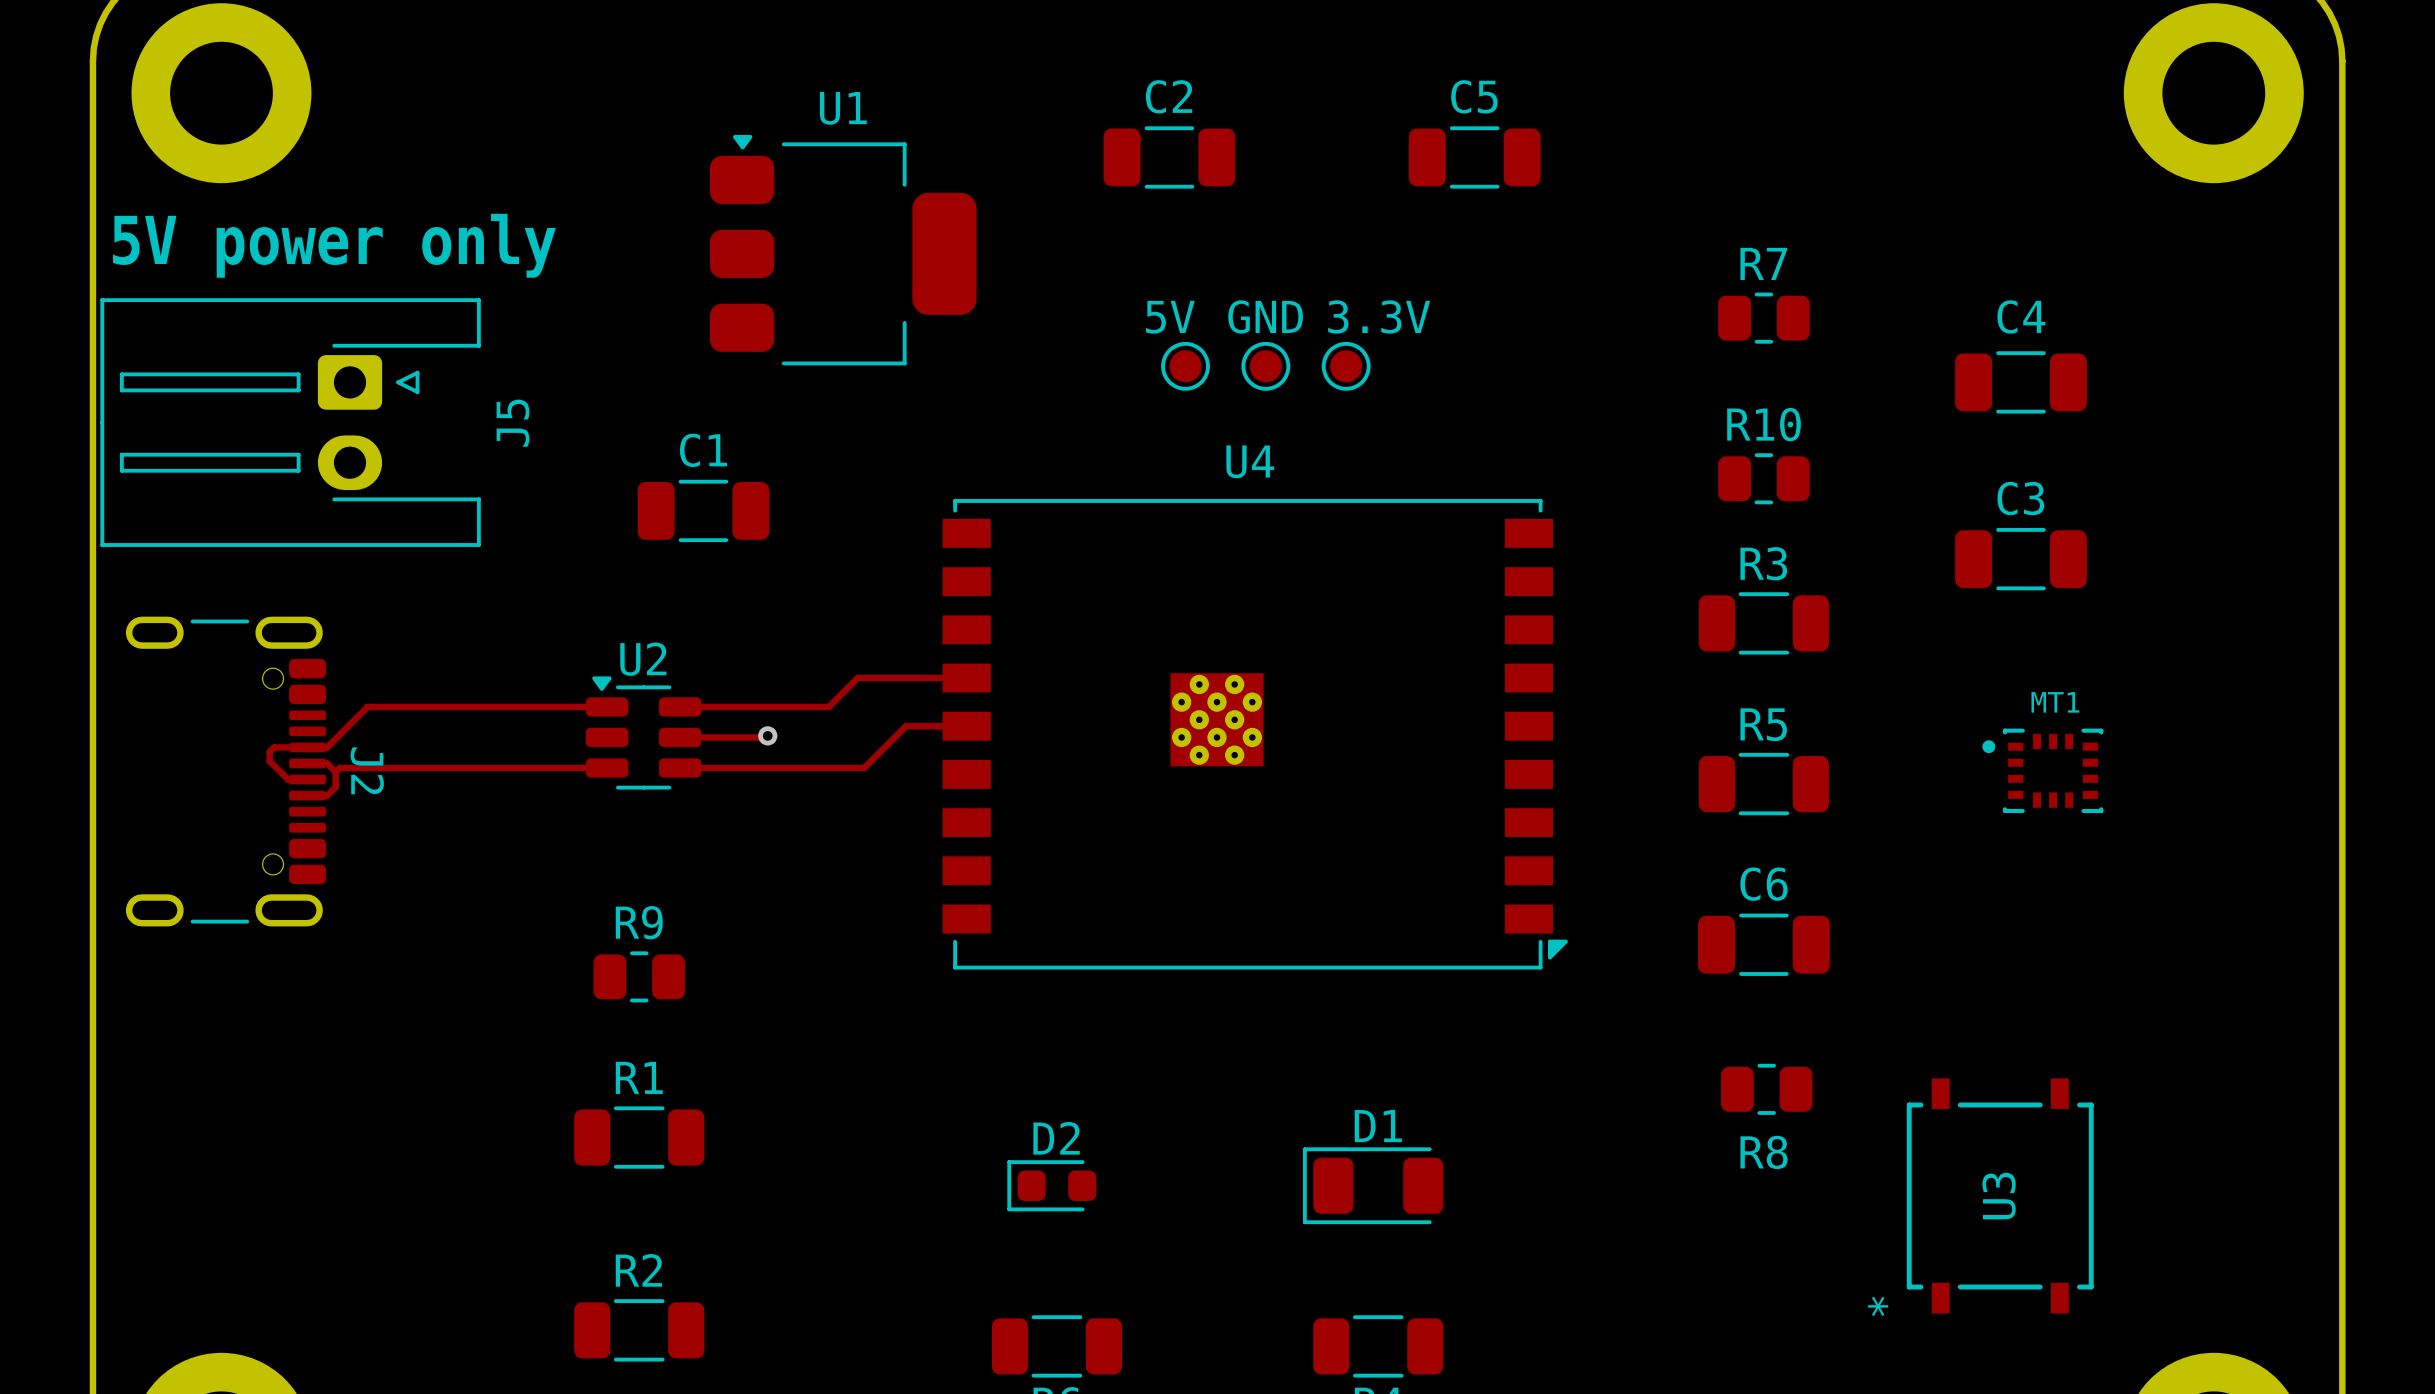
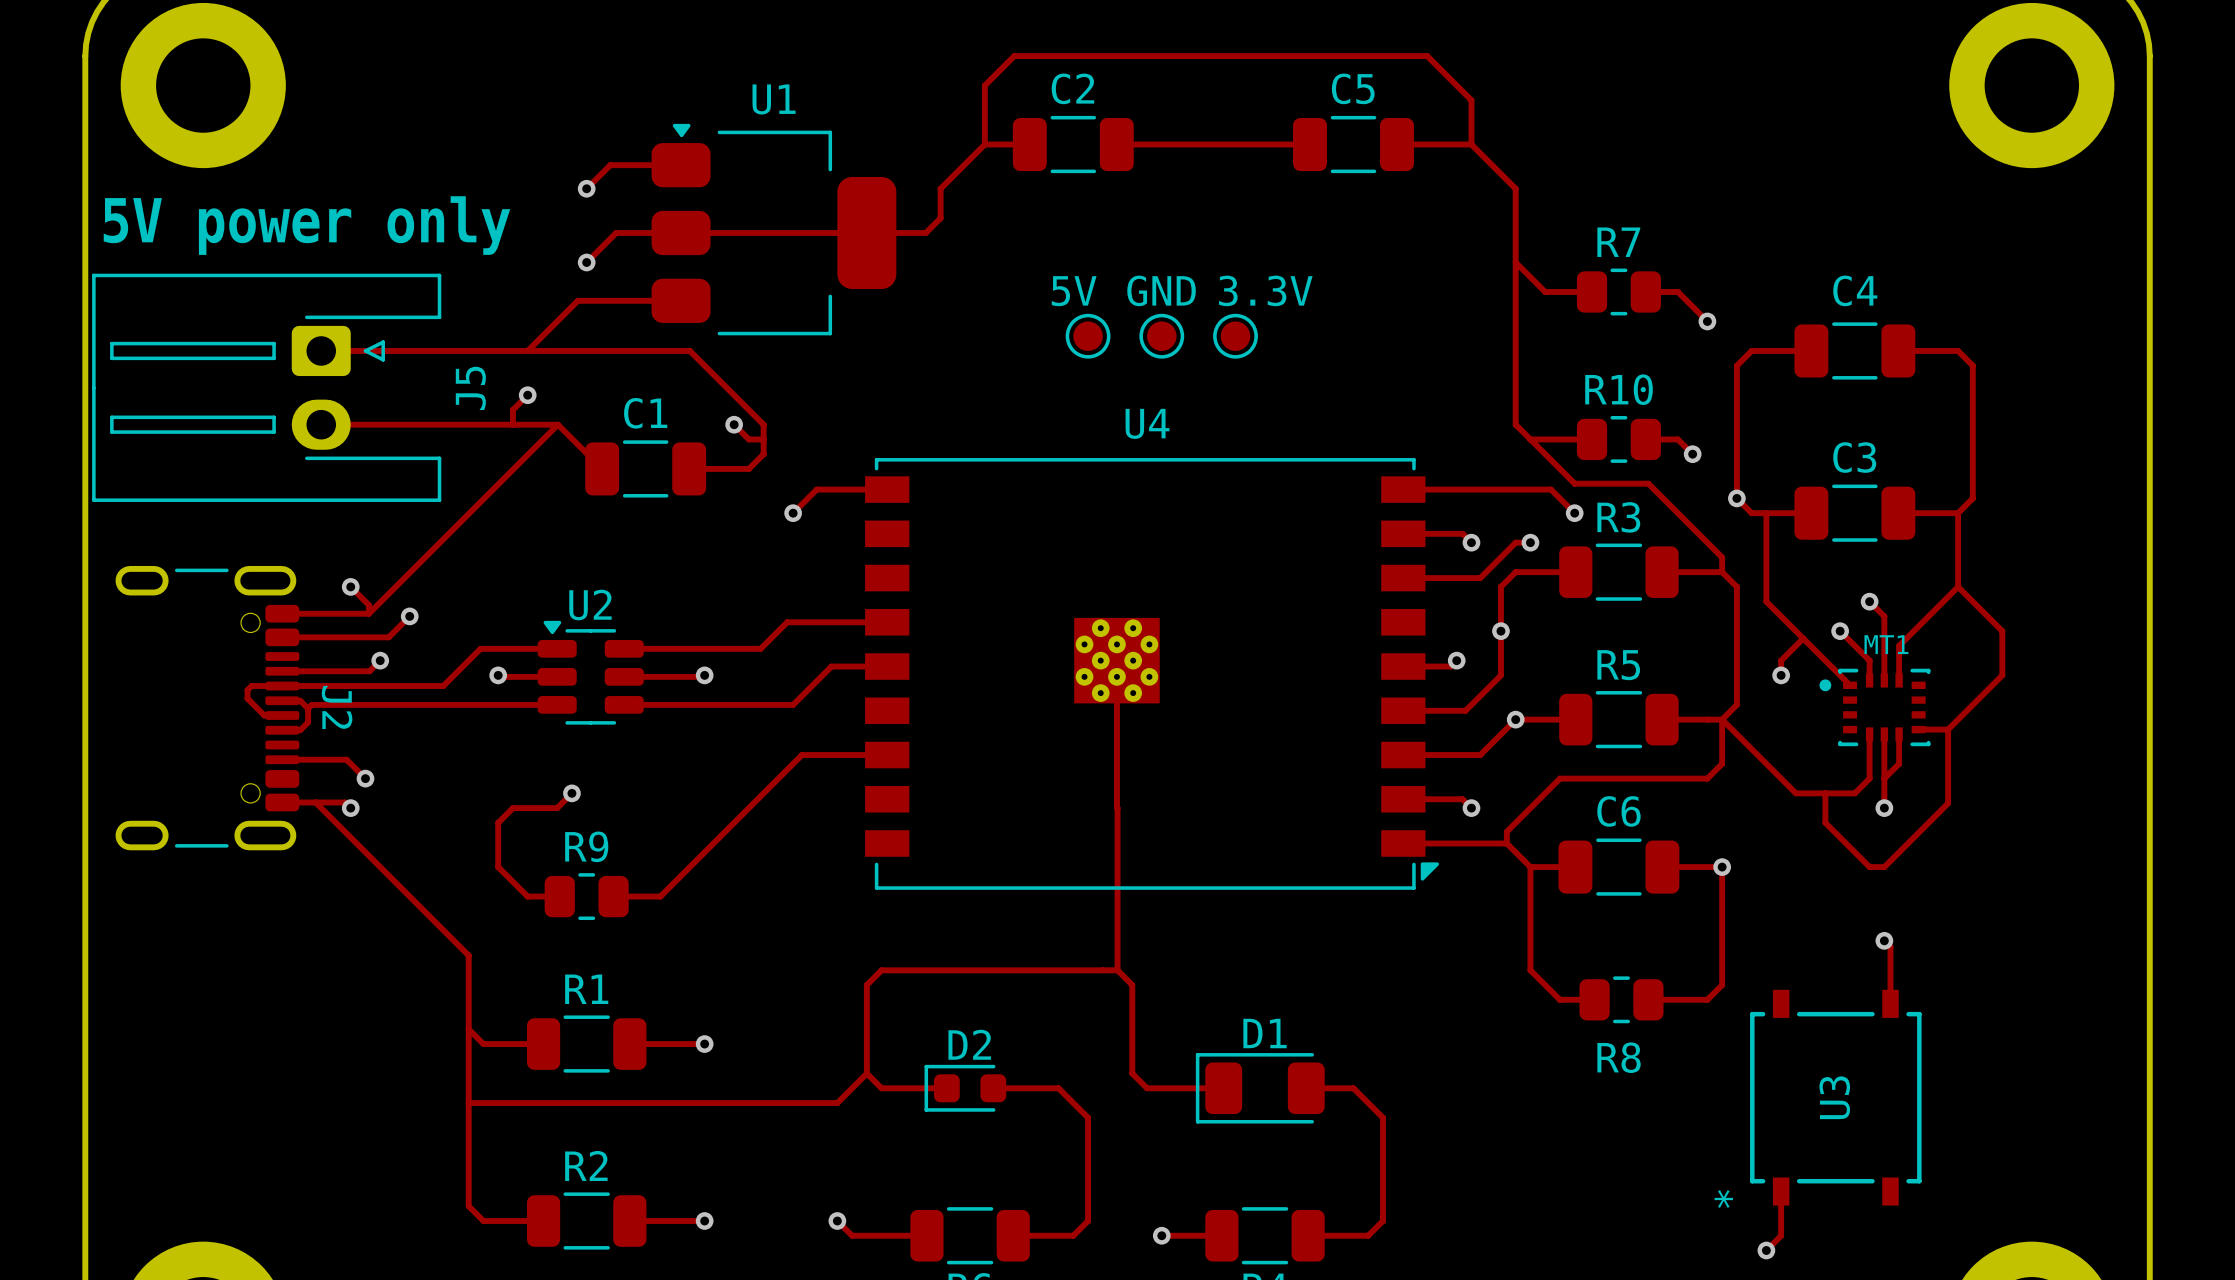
track: none -> (984, 144) (1029, 144)
track: none -> (984, 144) (940, 188) (940, 218) (925, 233) (616, 233) (586, 262)
track: none -> (984, 144) (984, 85) (1014, 56) (1427, 56) (1471, 100) (1471, 144)
track: none -> (1116, 144) (1309, 144)
track: none -> (1396, 144) (1471, 144)
track: none -> (1471, 144) (1515, 188) (1515, 424) (1574, 483) (1648, 483) (1722, 557) (1722, 572)
track: none -> (681, 165) (610, 165) (586, 188)
via: none -> (586, 188)
via: none -> (586, 262)
track: none -> (1515, 262) (1545, 291) (1592, 291)
track: none -> (1645, 291) (1677, 291) (1707, 321)
track: none -> (681, 300) (577, 300) (527, 350)
via: none -> (1707, 321)
track: none -> (321, 350) (689, 350) (763, 424) (763, 454) (748, 468) (689, 468)
track: none -> (1811, 350) (1751, 350) (1736, 365) (1736, 498) (1751, 513) (1811, 513)
track: none -> (1898, 350) (1958, 350) (1972, 365) (1972, 498) (1958, 513)
track: none -> (527, 395) (512, 409) (512, 424)
via: none -> (527, 395)
track: none -> (321, 424) (557, 424)
track: none -> (557, 424) (368, 613)
track: none -> (557, 424) (602, 468)
track: none -> (734, 424) (748, 439) (763, 439)
via: none -> (734, 424)
track: none -> (1530, 439) (1592, 439)
track: none -> (1645, 439) (1677, 439) (1692, 454)
via: none -> (1692, 454)
track: none -> (887, 489) (816, 489) (793, 513)
track: none -> (1403, 489) (1551, 489) (1574, 513)
via: none -> (1736, 498)
via: none -> (793, 513)
via: none -> (1574, 513)
track: none -> (1766, 513) (1766, 601) (1850, 685)
track: none -> (1898, 513) (1958, 513)
track: none -> (1958, 513) (1958, 586)
track: none -> (1403, 533) (1462, 533) (1471, 542)
via: none -> (1471, 542)
track: none -> (1530, 542) (1515, 542) (1480, 578) (1403, 578)
via: none -> (1530, 542)
track: none -> (1575, 572) (1515, 572) (1500, 586) (1500, 675) (1465, 710) (1403, 710)
track: none -> (1662, 572) (1722, 572)
track: none -> (1722, 572) (1736, 586) (1736, 704) (1722, 719)
track: none -> (350, 586) (368, 605) (368, 613)
via: none -> (350, 586)
track: none -> (1958, 586) (1899, 645) (1899, 680)
track: none -> (1958, 586) (2002, 631) (2002, 675) (1948, 729)
track: none -> (1869, 601) (1884, 616) (1884, 680)
via: none -> (1869, 601)
track: none -> (282, 613) (368, 613)
track: none -> (409, 616) (388, 637) (282, 637)
via: none -> (409, 616)
via: none -> (1500, 631)
track: none -> (1840, 631) (1869, 660) (1869, 680)
via: none -> (1840, 631)
track: none -> (1803, 638) (1781, 660) (1781, 675)
track: (523, 706) (367, 706) (327, 747) -> (480, 648) (443, 686) (300, 686)
track: none -> (380, 660) (369, 671) (282, 671)
via: none -> (380, 660)
track: none -> (1116, 660) (1117, 970)
track: none -> (1456, 660) (1450, 666) (1403, 666)
via: none -> (1456, 660)
track: none -> (498, 675) (557, 676)
via: none -> (498, 675)
via: none -> (1781, 675)
via: none -> (1515, 719)
track: none -> (1575, 719) (1515, 719) (1480, 755) (1403, 755)
track: none -> (1662, 719) (1722, 719)
track: none -> (1722, 719) (1722, 763) (1707, 778) (1559, 778) (1506, 831) (1506, 843)
track: none -> (1722, 719) (1795, 793) (1854, 793) (1869, 778) (1869, 734)
track: none -> (1918, 729) (1948, 729)
track: none -> (1948, 729) (1948, 803) (1884, 867) (1869, 867) (1825, 822) (1825, 793)
track: none -> (1884, 734) (1884, 808)
track: none -> (1899, 734) (1899, 763) (1884, 778)
track: none -> (887, 755) (801, 755) (660, 896) (613, 896)
track: none -> (282, 759) (346, 759) (365, 778)
via: none -> (365, 778)
track: none -> (571, 793) (557, 808) (512, 808) (498, 822) (498, 867) (527, 896) (559, 896)
via: none -> (571, 793)
track: none -> (1403, 799) (1462, 799) (1471, 808)
track: none -> (282, 802) (345, 802) (350, 808)
track: none -> (315, 802) (468, 955) (468, 1206) (483, 1221) (543, 1221)
via: none -> (350, 808)
via: none -> (1471, 808)
via: none -> (1884, 808)
track: none -> (1403, 843) (1506, 843)
track: none -> (1506, 843) (1530, 867)
track: none -> (1530, 867) (1530, 970) (1559, 999) (1594, 999)
track: none -> (1530, 867) (1575, 867)
track: none -> (1662, 867) (1722, 867) (1722, 985) (1707, 999) (1648, 999)
via: none -> (1722, 867)
track: none -> (1884, 940) (1890, 946) (1890, 1003)
via: none -> (1884, 940)
track: none -> (1117, 970) (881, 970) (866, 985) (866, 1073)
track: none -> (1117, 970) (1132, 985) (1132, 1073) (1147, 1088) (1223, 1088)
track: none -> (468, 1029) (483, 1044) (543, 1044)
track: none -> (629, 1044) (704, 1044)
via: none -> (704, 1044)
track: none -> (866, 1073) (881, 1088) (946, 1088)
track: none -> (866, 1073) (837, 1103) (468, 1103)
track: none -> (993, 1088) (1058, 1088) (1088, 1117) (1088, 1221) (1073, 1235) (1013, 1235)
track: none -> (1306, 1088) (1353, 1088) (1382, 1117) (1382, 1221) (1368, 1235) (1308, 1235)
track: none -> (1781, 1191) (1781, 1235) (1766, 1250)
track: none -> (629, 1221) (704, 1221)
via: none -> (704, 1221)
track: none -> (837, 1221) (852, 1235) (926, 1235)
via: none -> (837, 1221)
track: none -> (1161, 1235) (1221, 1235)
via: none -> (1161, 1235)
via: none -> (1766, 1250)

